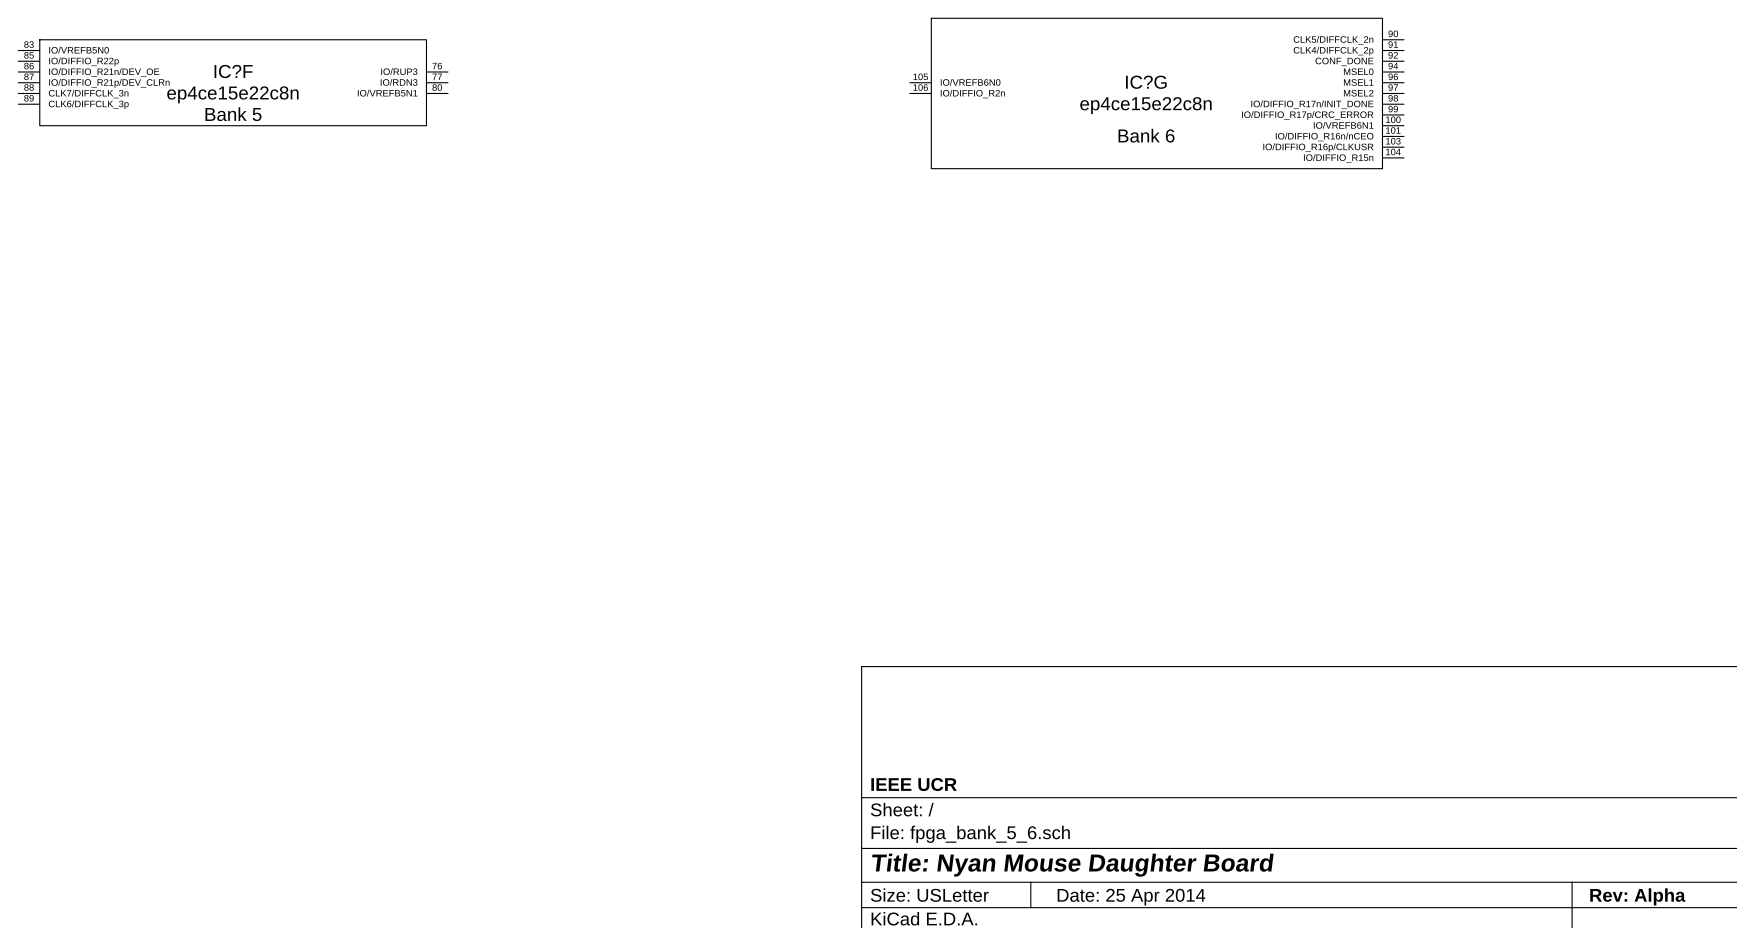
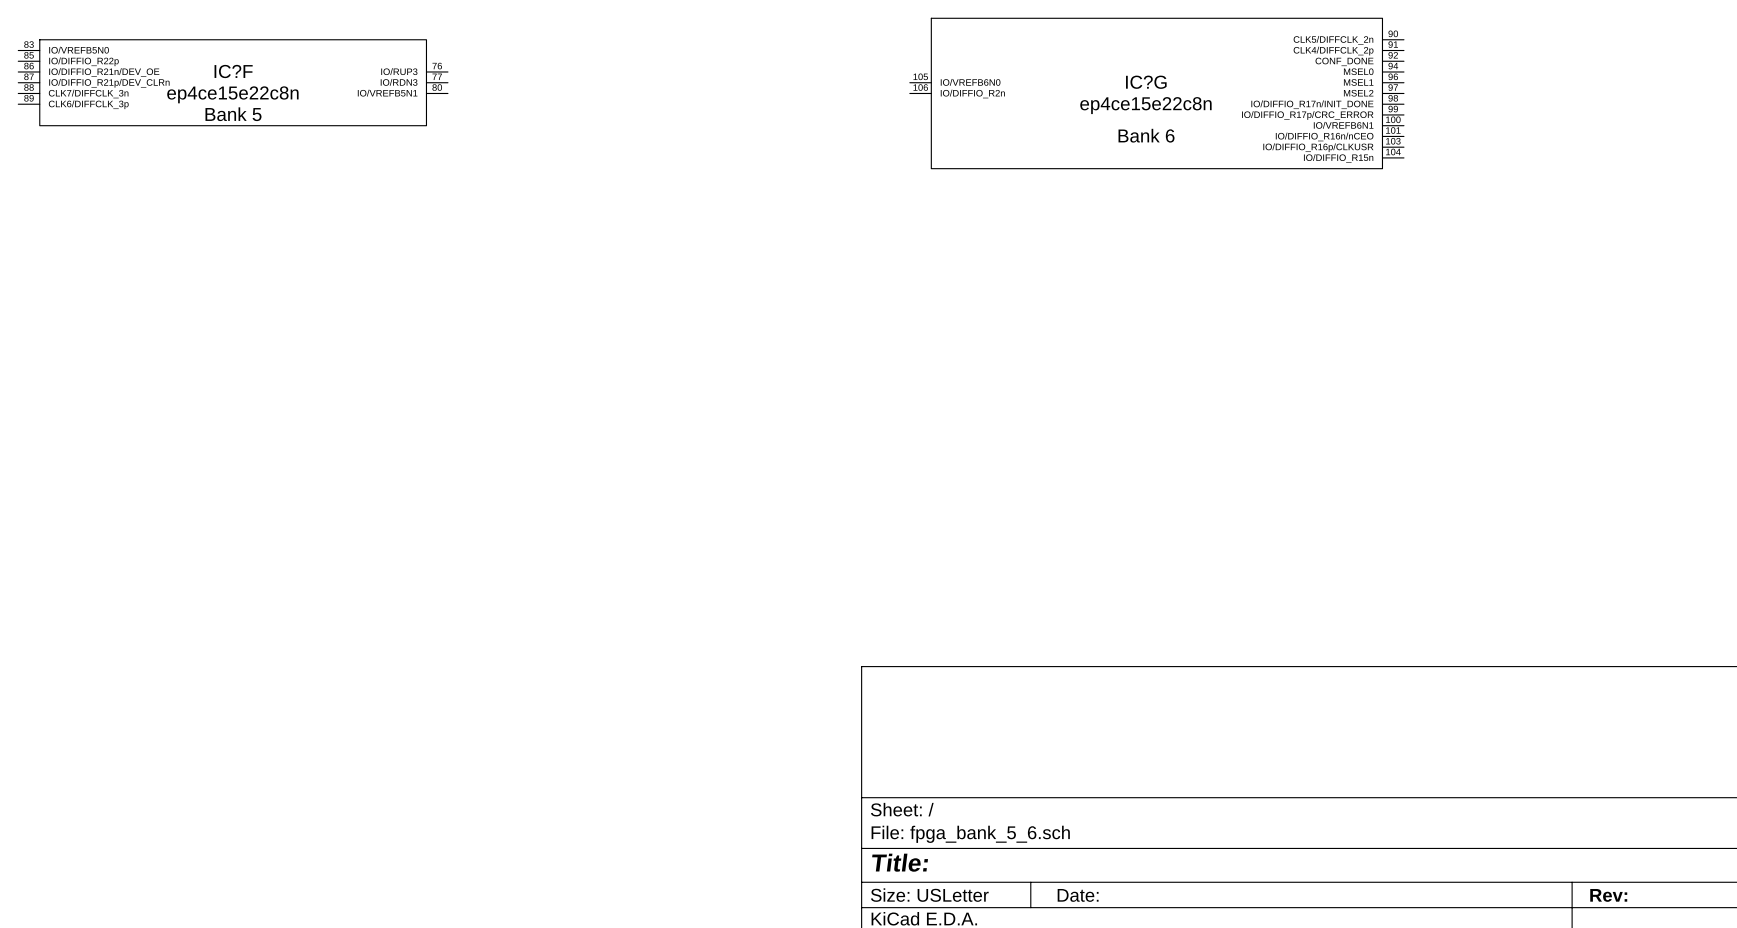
title block: IEEE UCR (914, 784) -> none
title block: Title: Nyan Mouse Daughter Board (1072, 865) -> Title: (900, 862)
title block: Rev: Alpha (1637, 896) -> Rev: (1608, 895)
title block: Date: 25 Apr 2014 (1131, 897) -> Date: (1078, 895)

